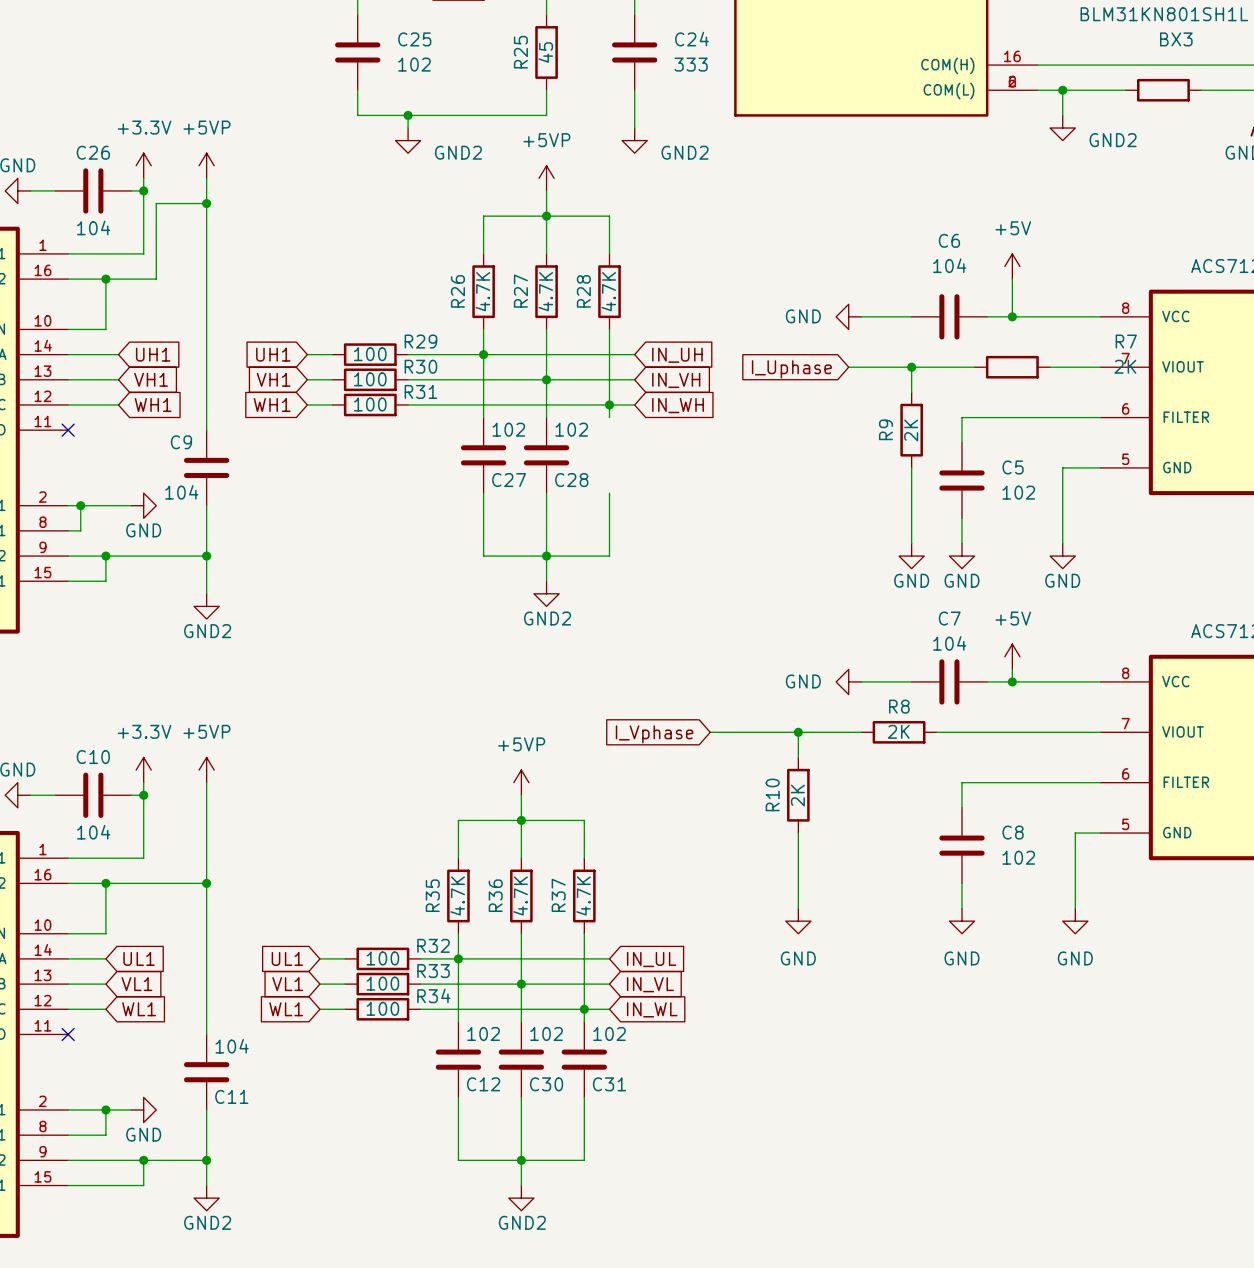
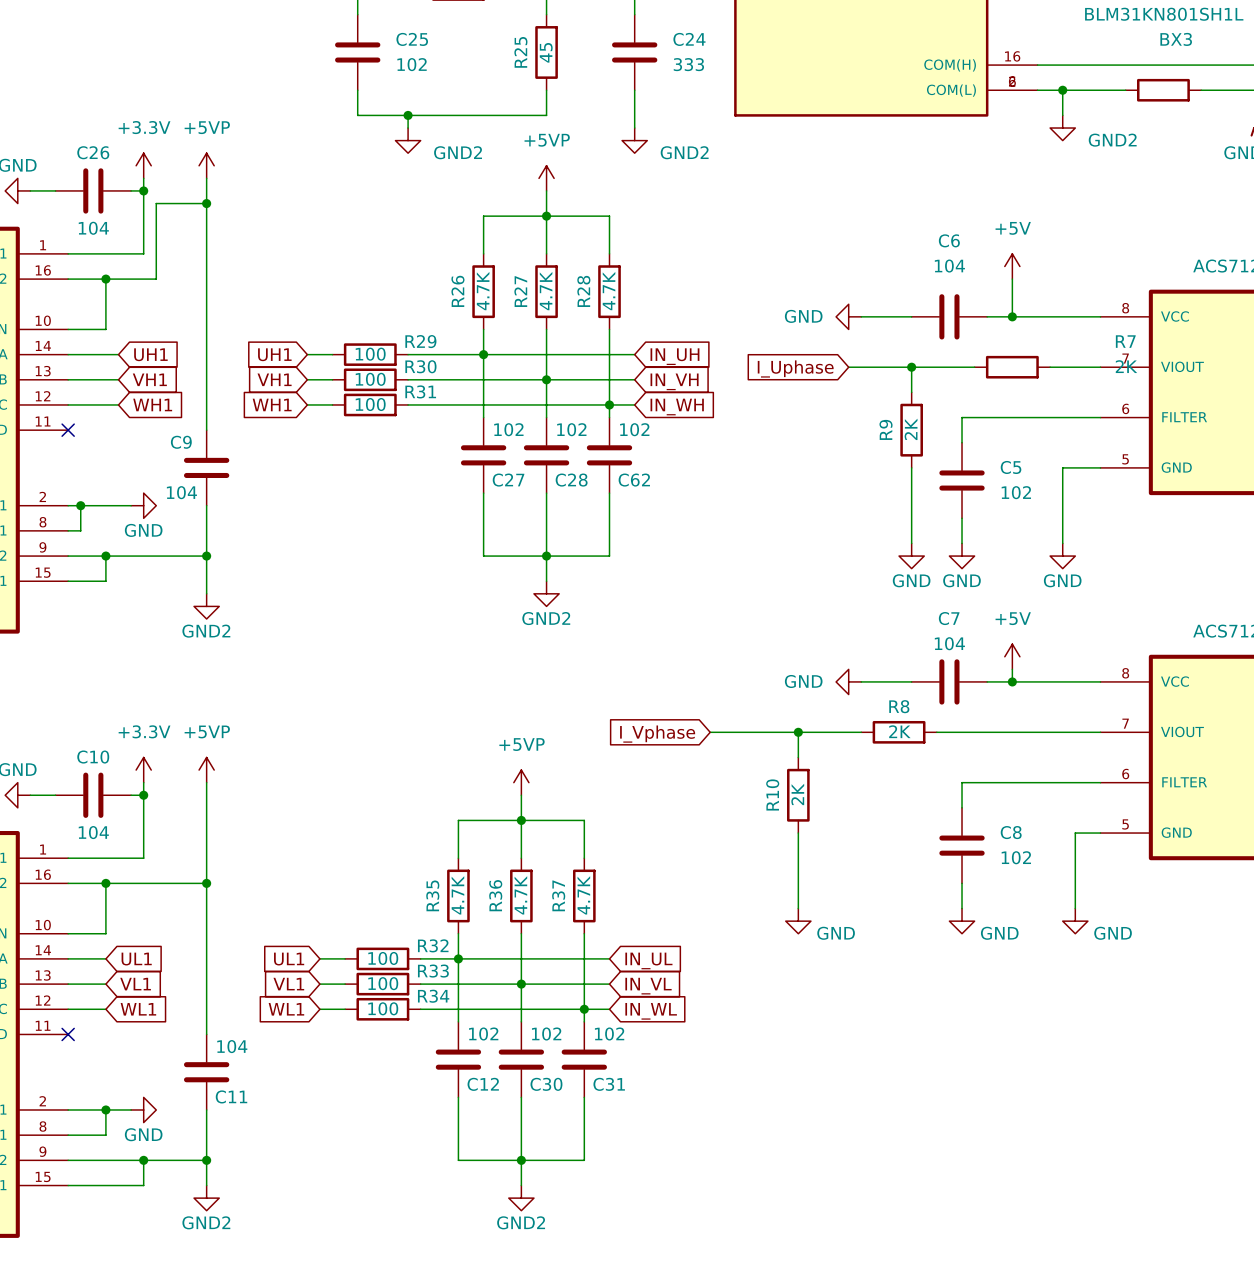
C62: none -> 102 (609, 455)
power symbol text position: GND (798, 958) -> GND (836, 933)
power symbol text position: GND (962, 958) -> GND (999, 933)
power symbol text position: GND (1075, 958) -> GND (1113, 933)

